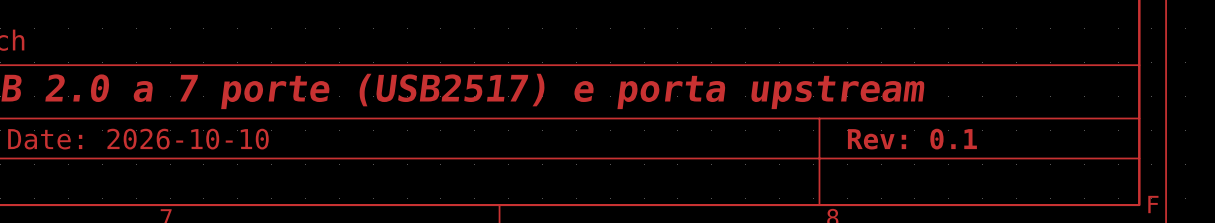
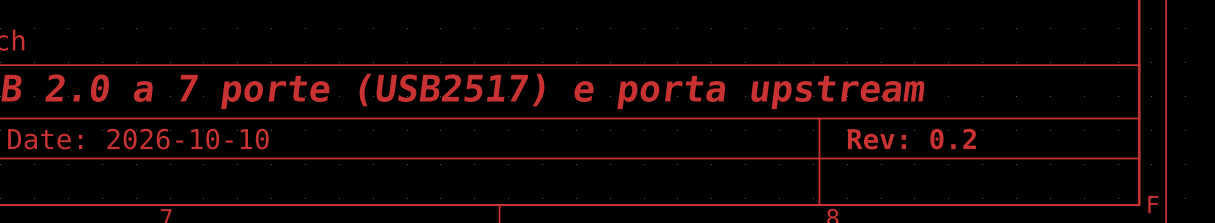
title block: Rev: 0.1 (912, 139) -> Rev: 0.2 (911, 139)

